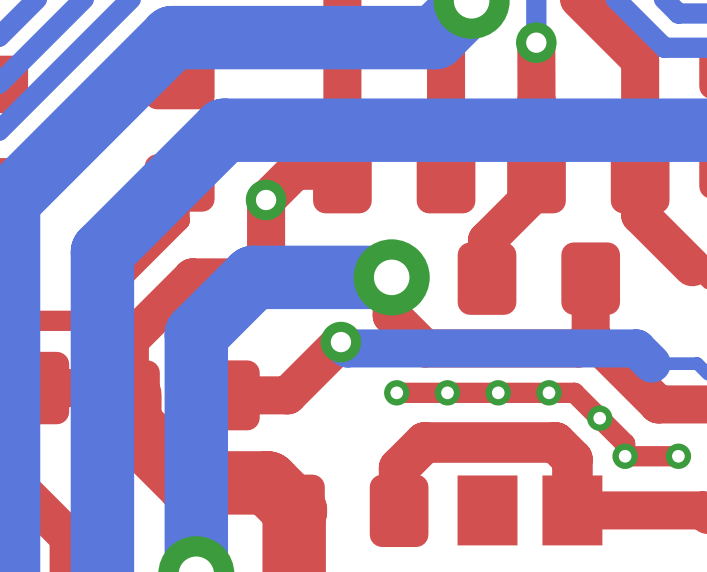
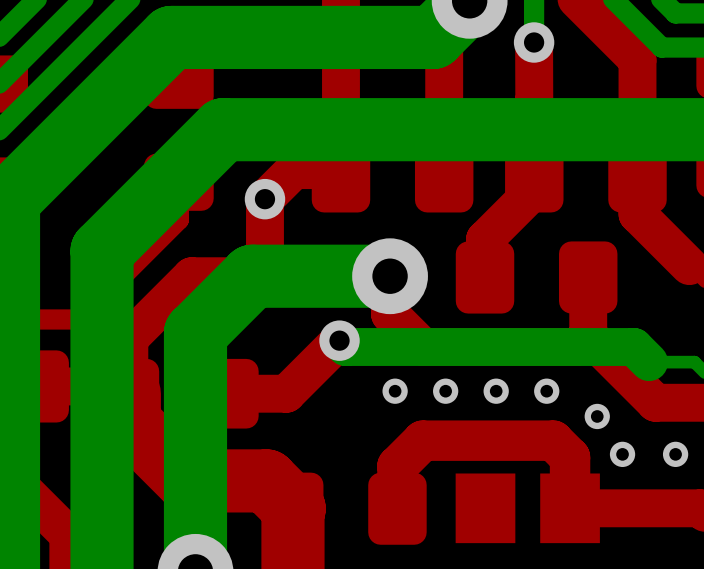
top track: (396, 392) (574, 392) (625, 443) (625, 456) (678, 456) -> none

